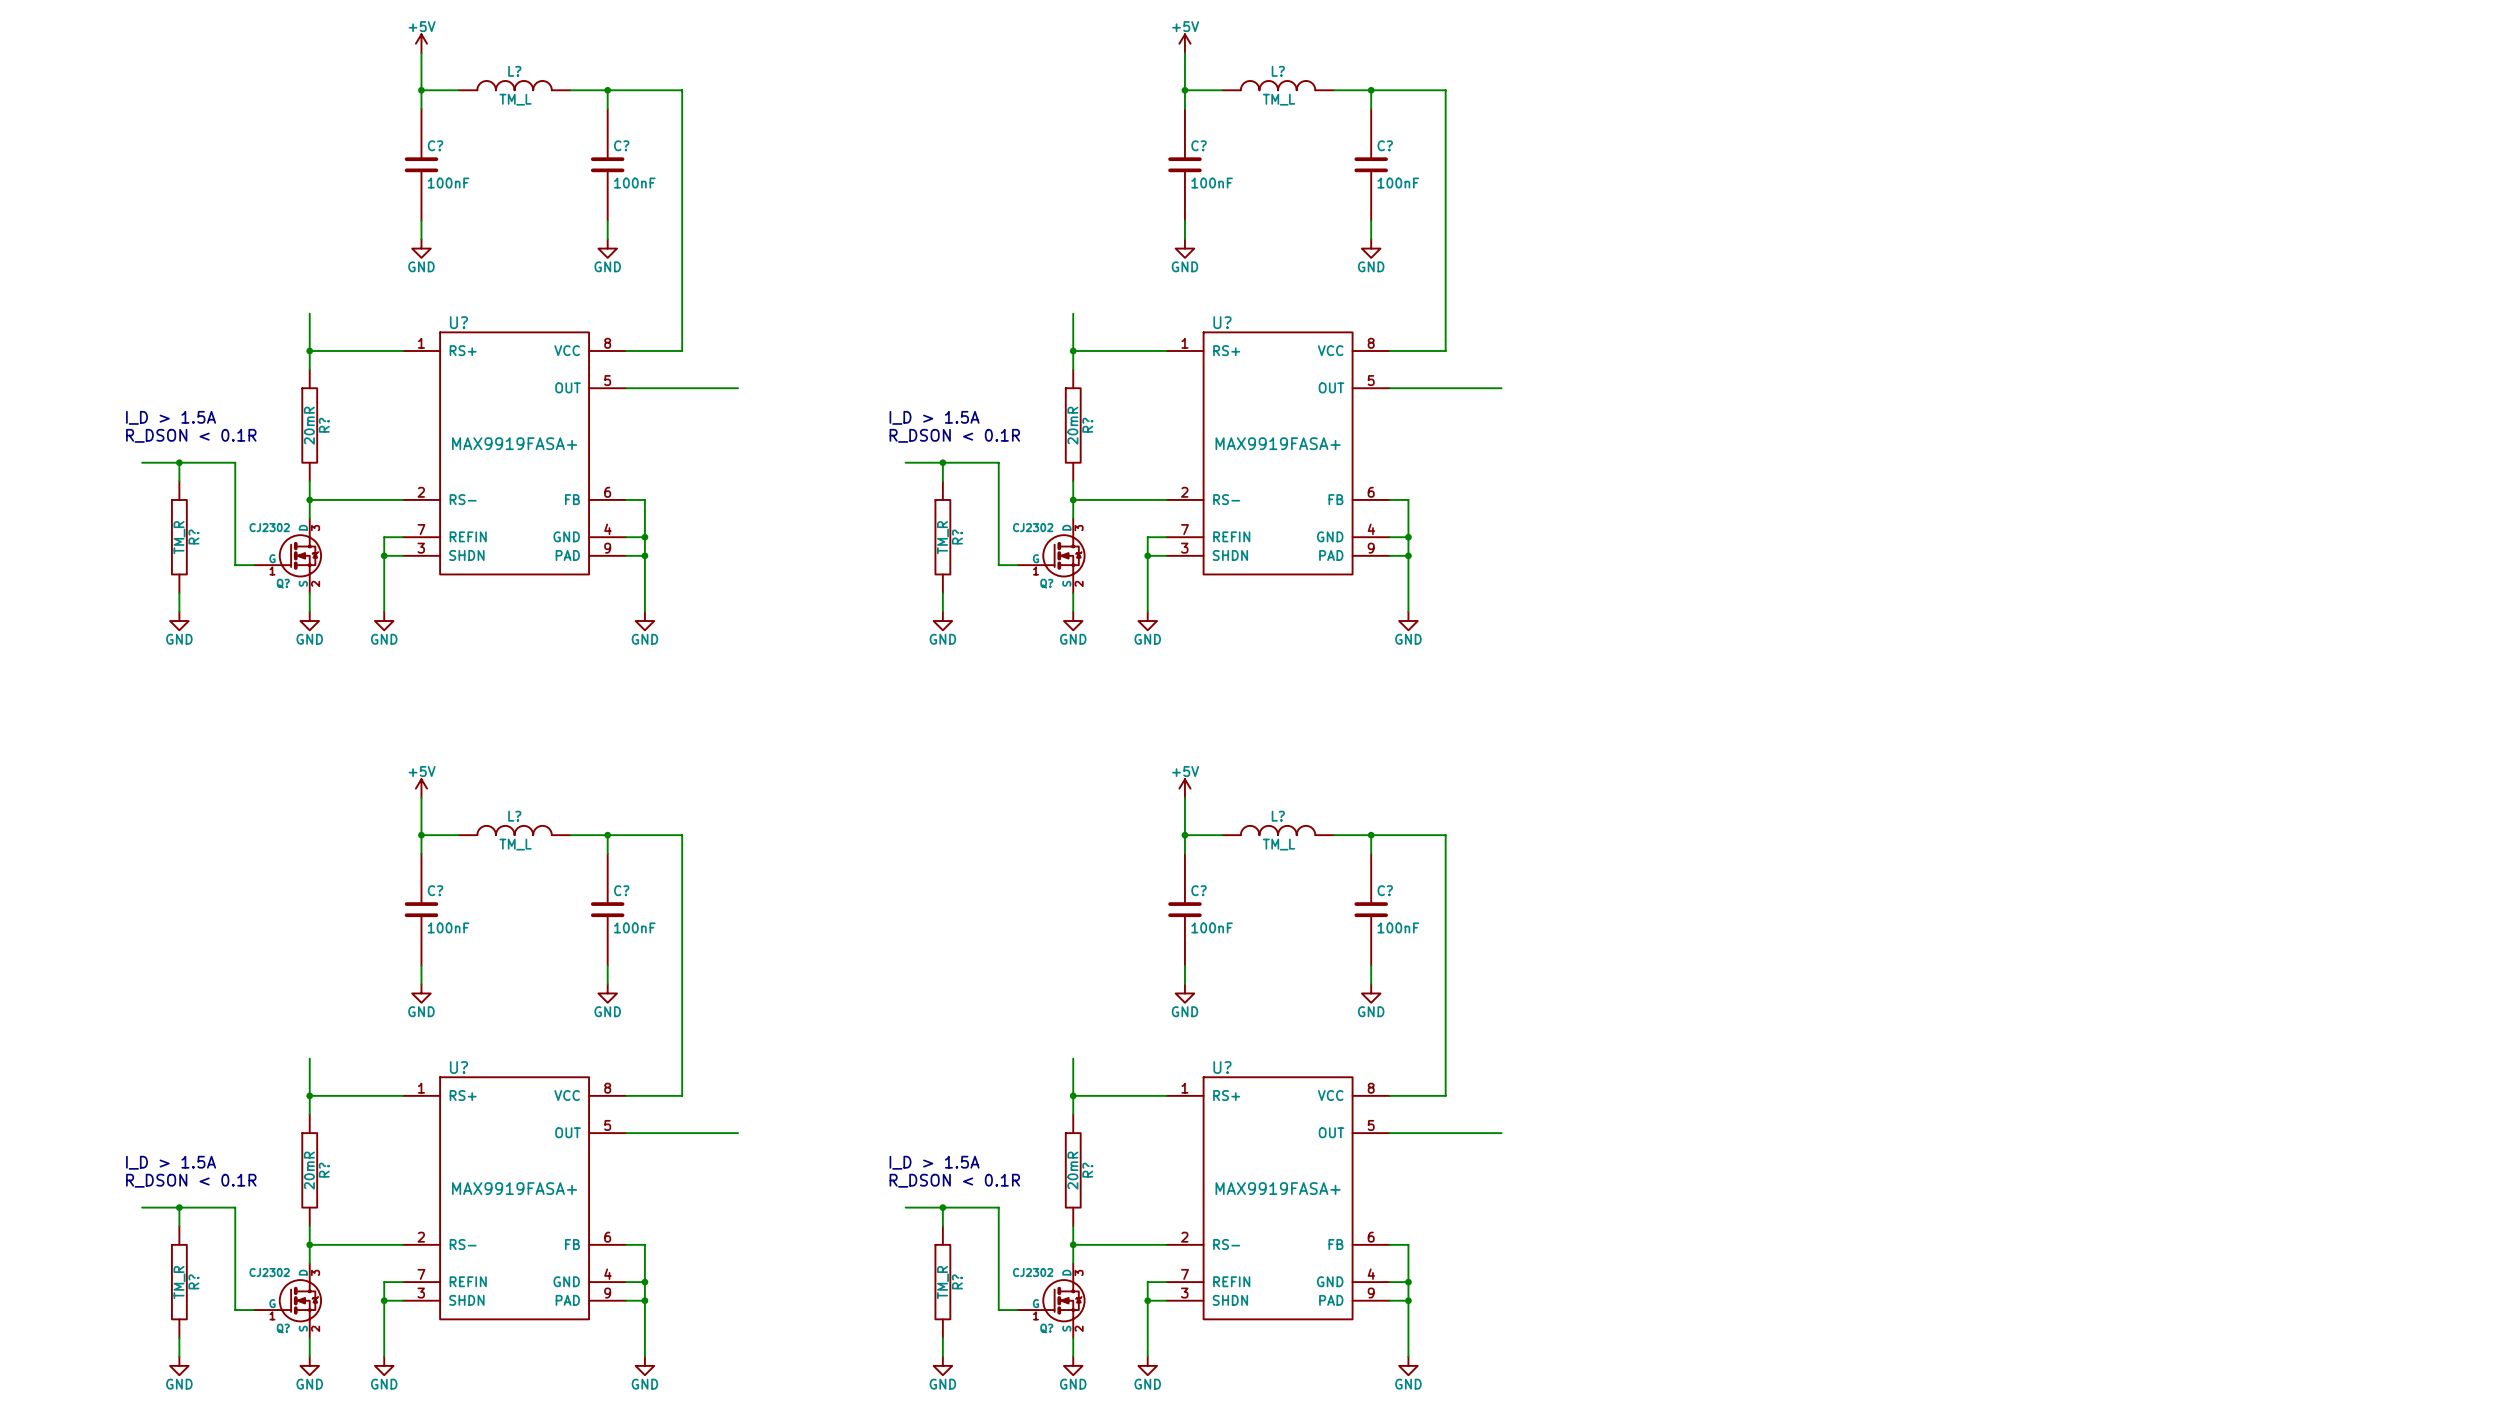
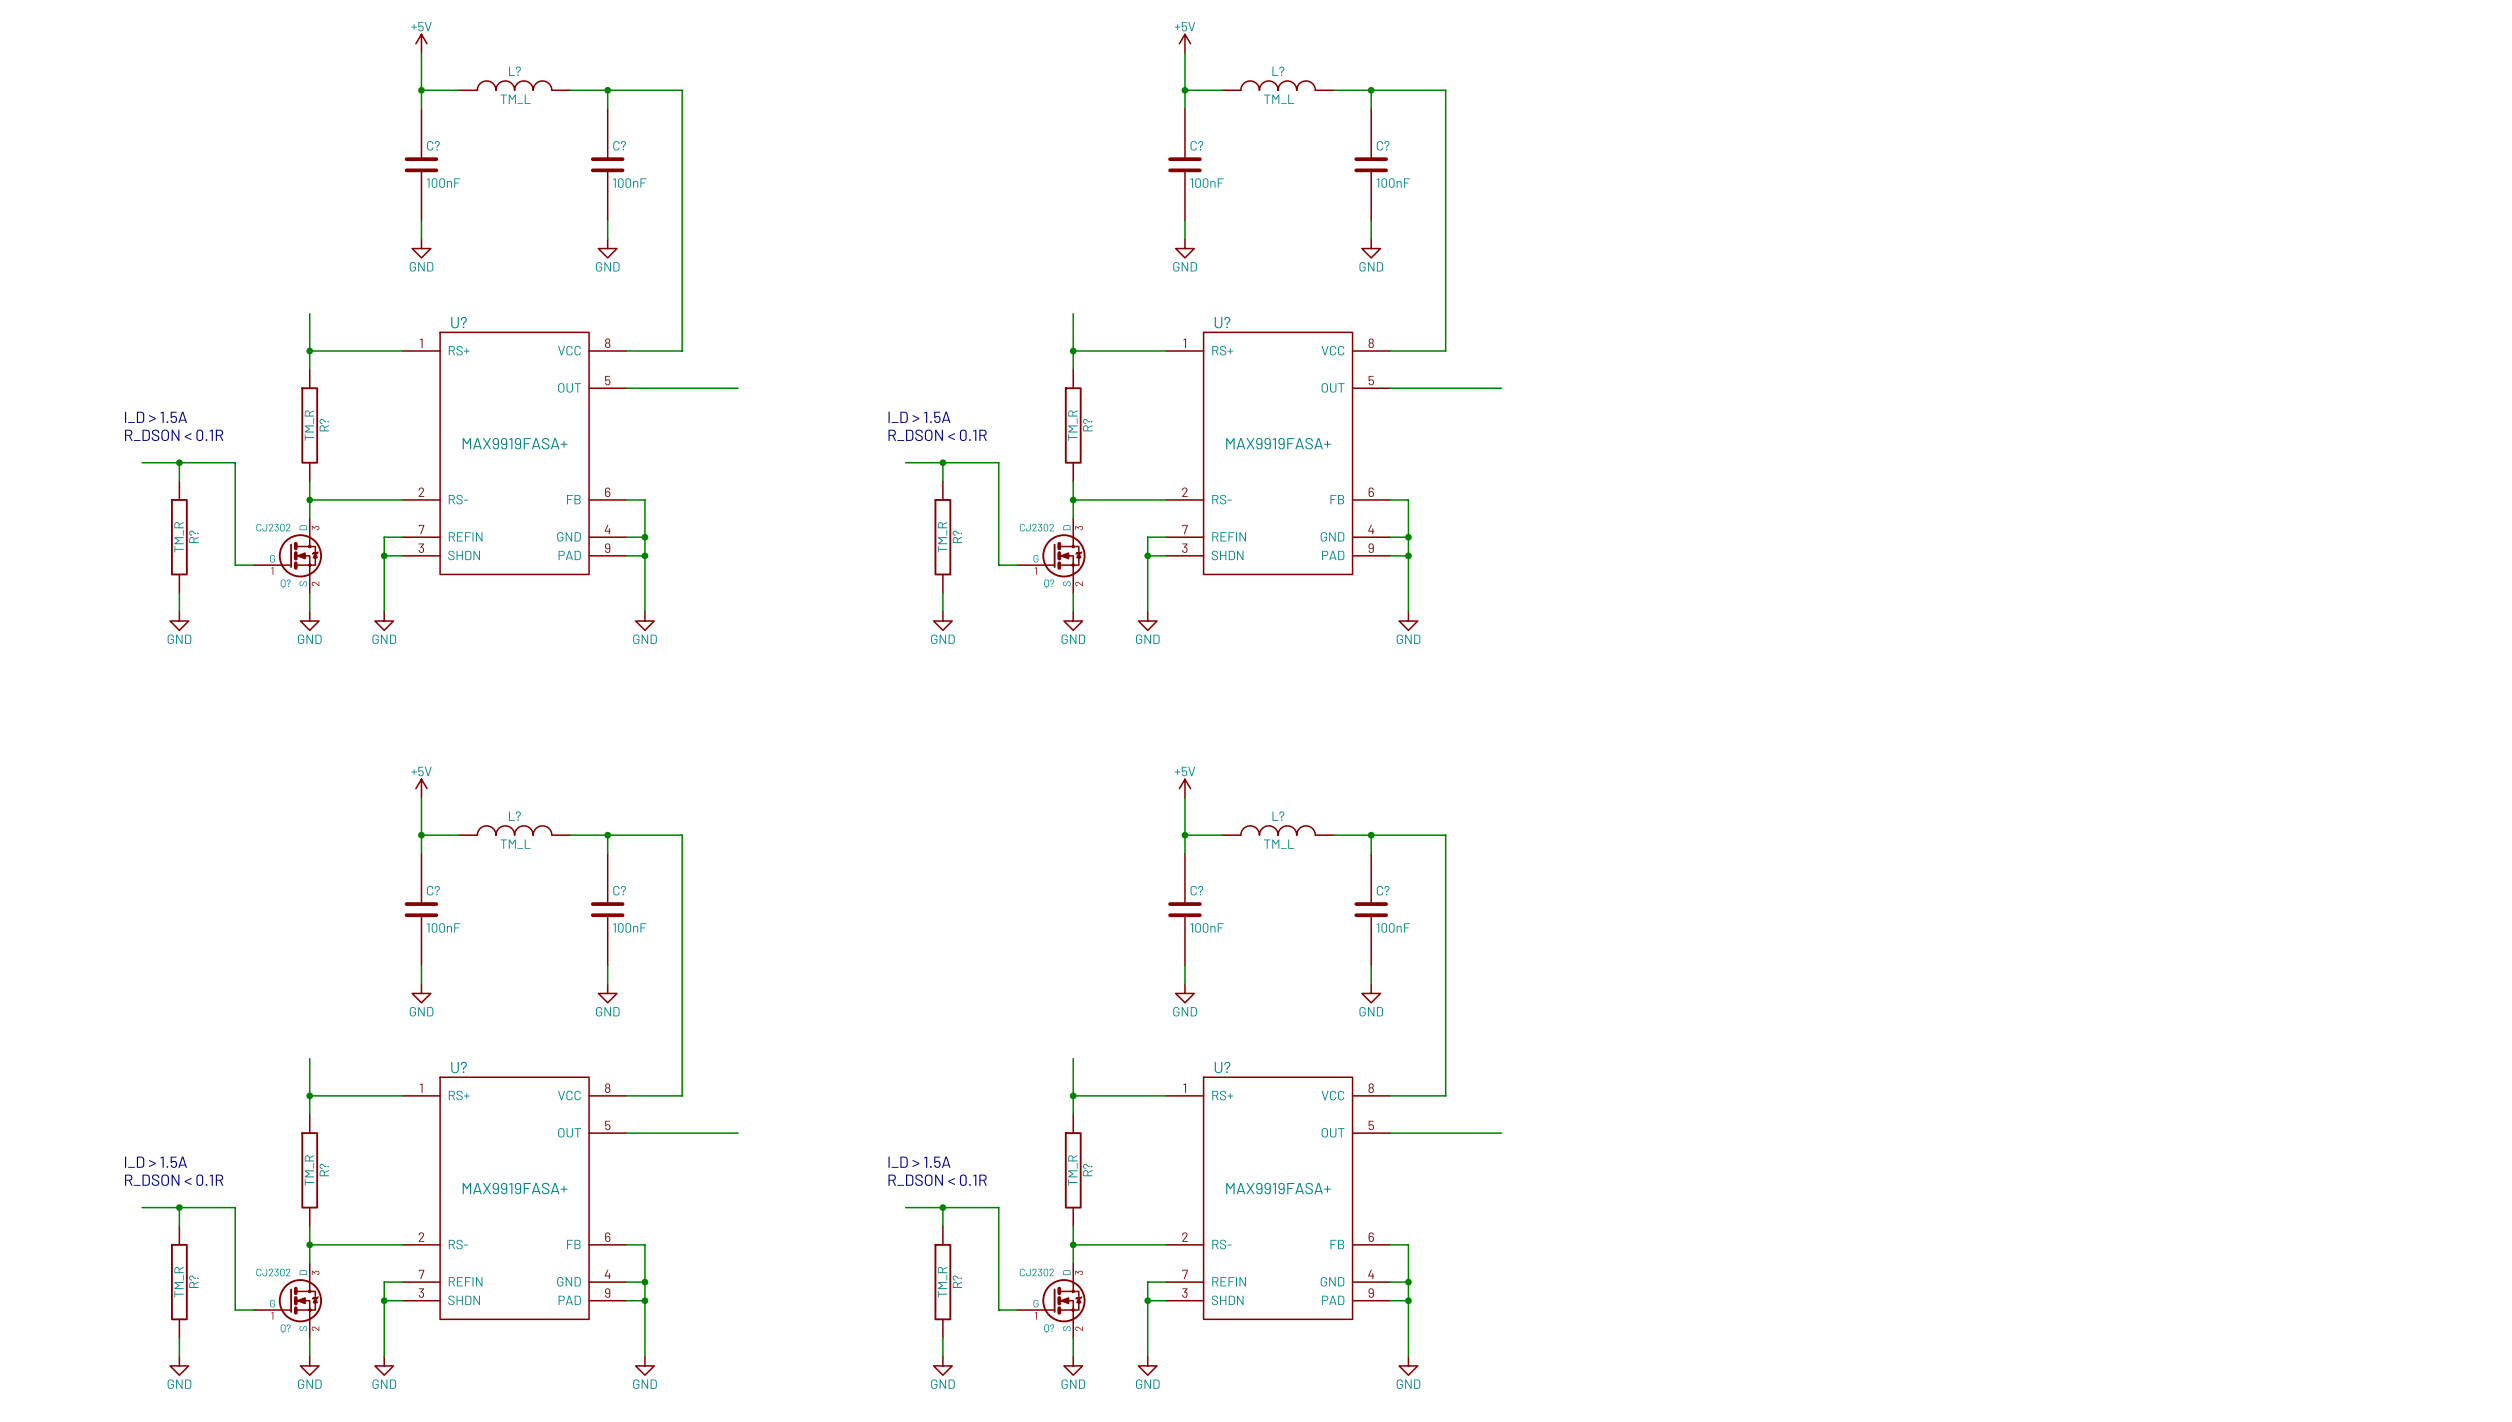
R? value: 20mR (309, 425) -> TM_R (309, 425)
R? value: 20mR (1072, 425) -> TM_R (1072, 425)
R? value: 20mR (309, 1170) -> TM_R (309, 1170)
R? value: 20mR (1072, 1170) -> TM_R (1072, 1170)

